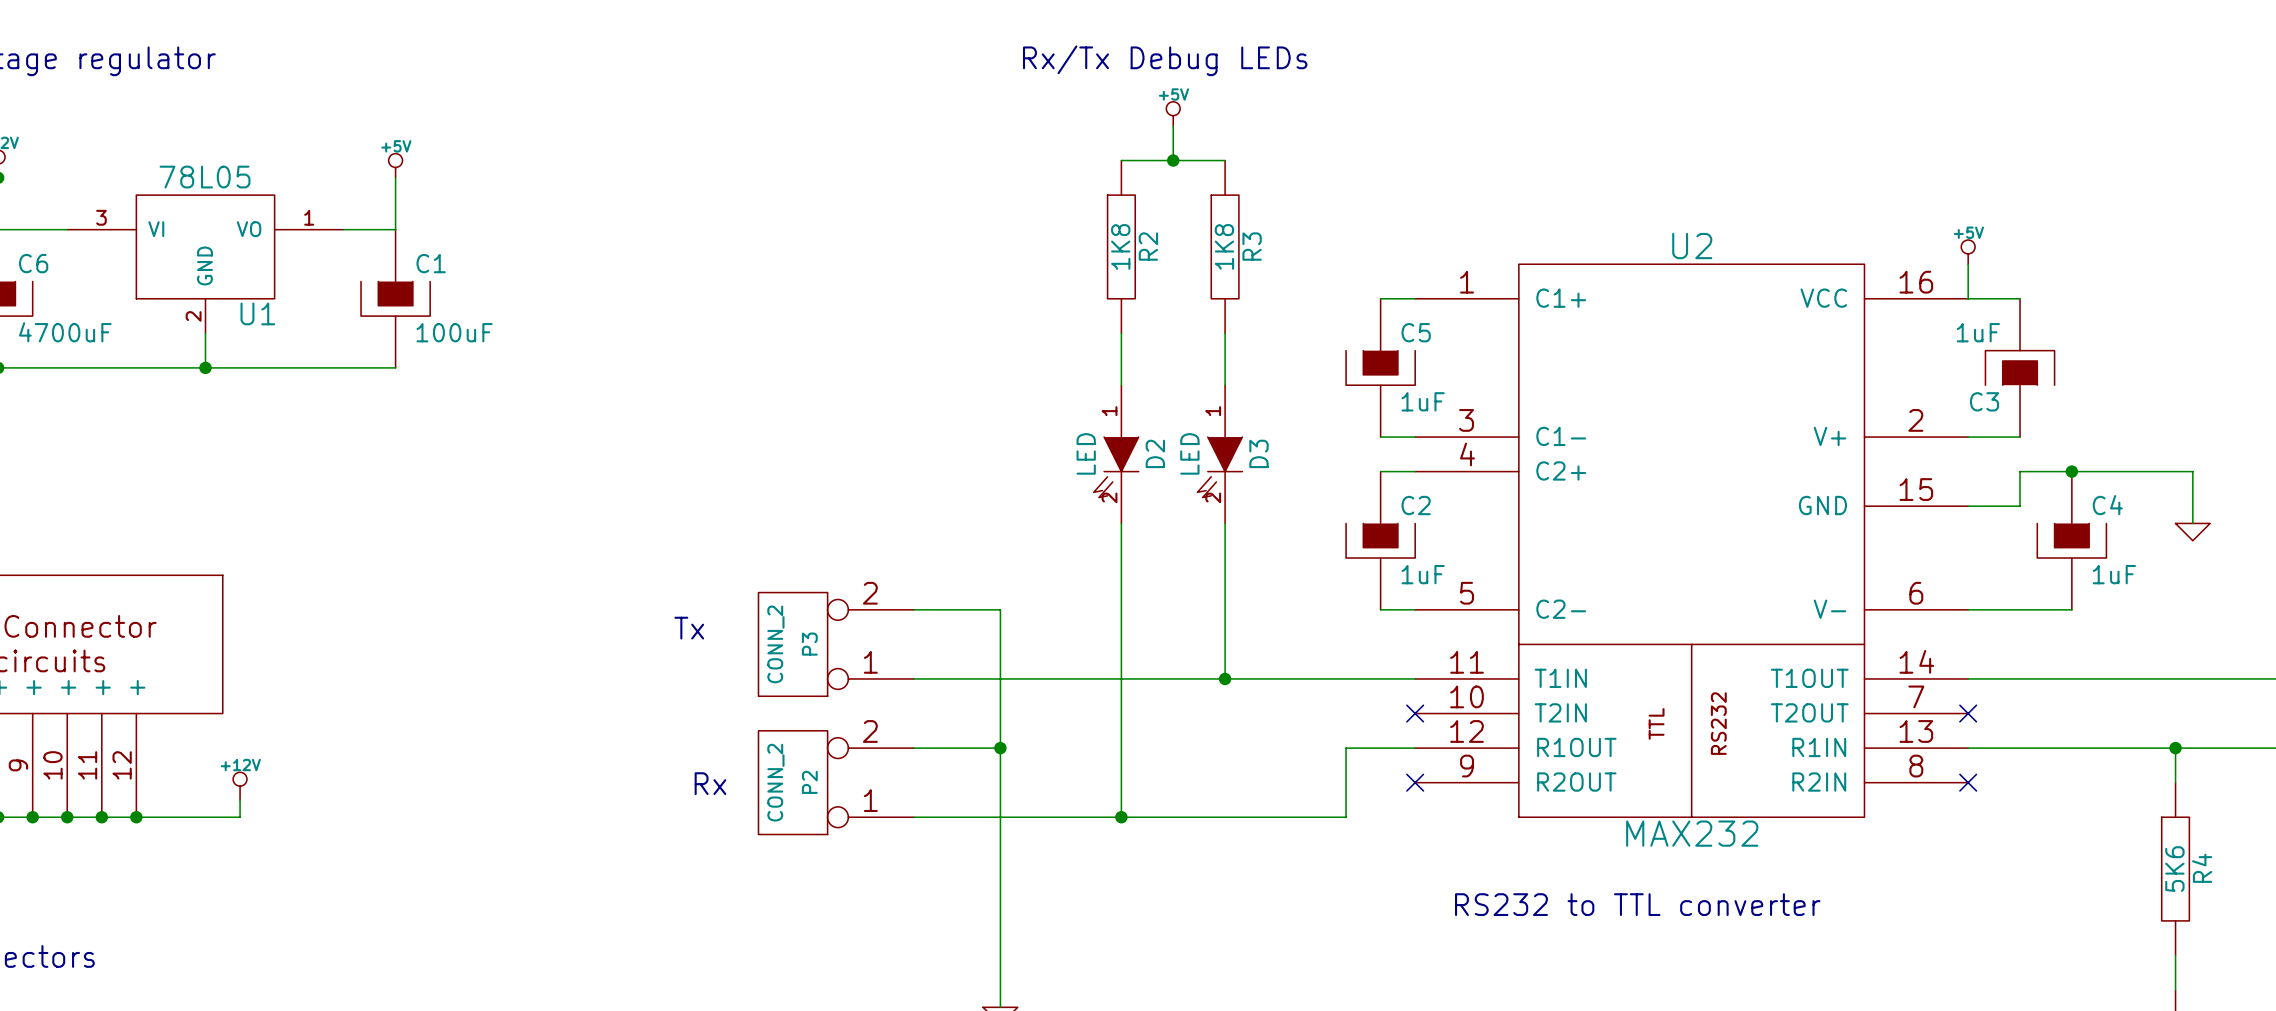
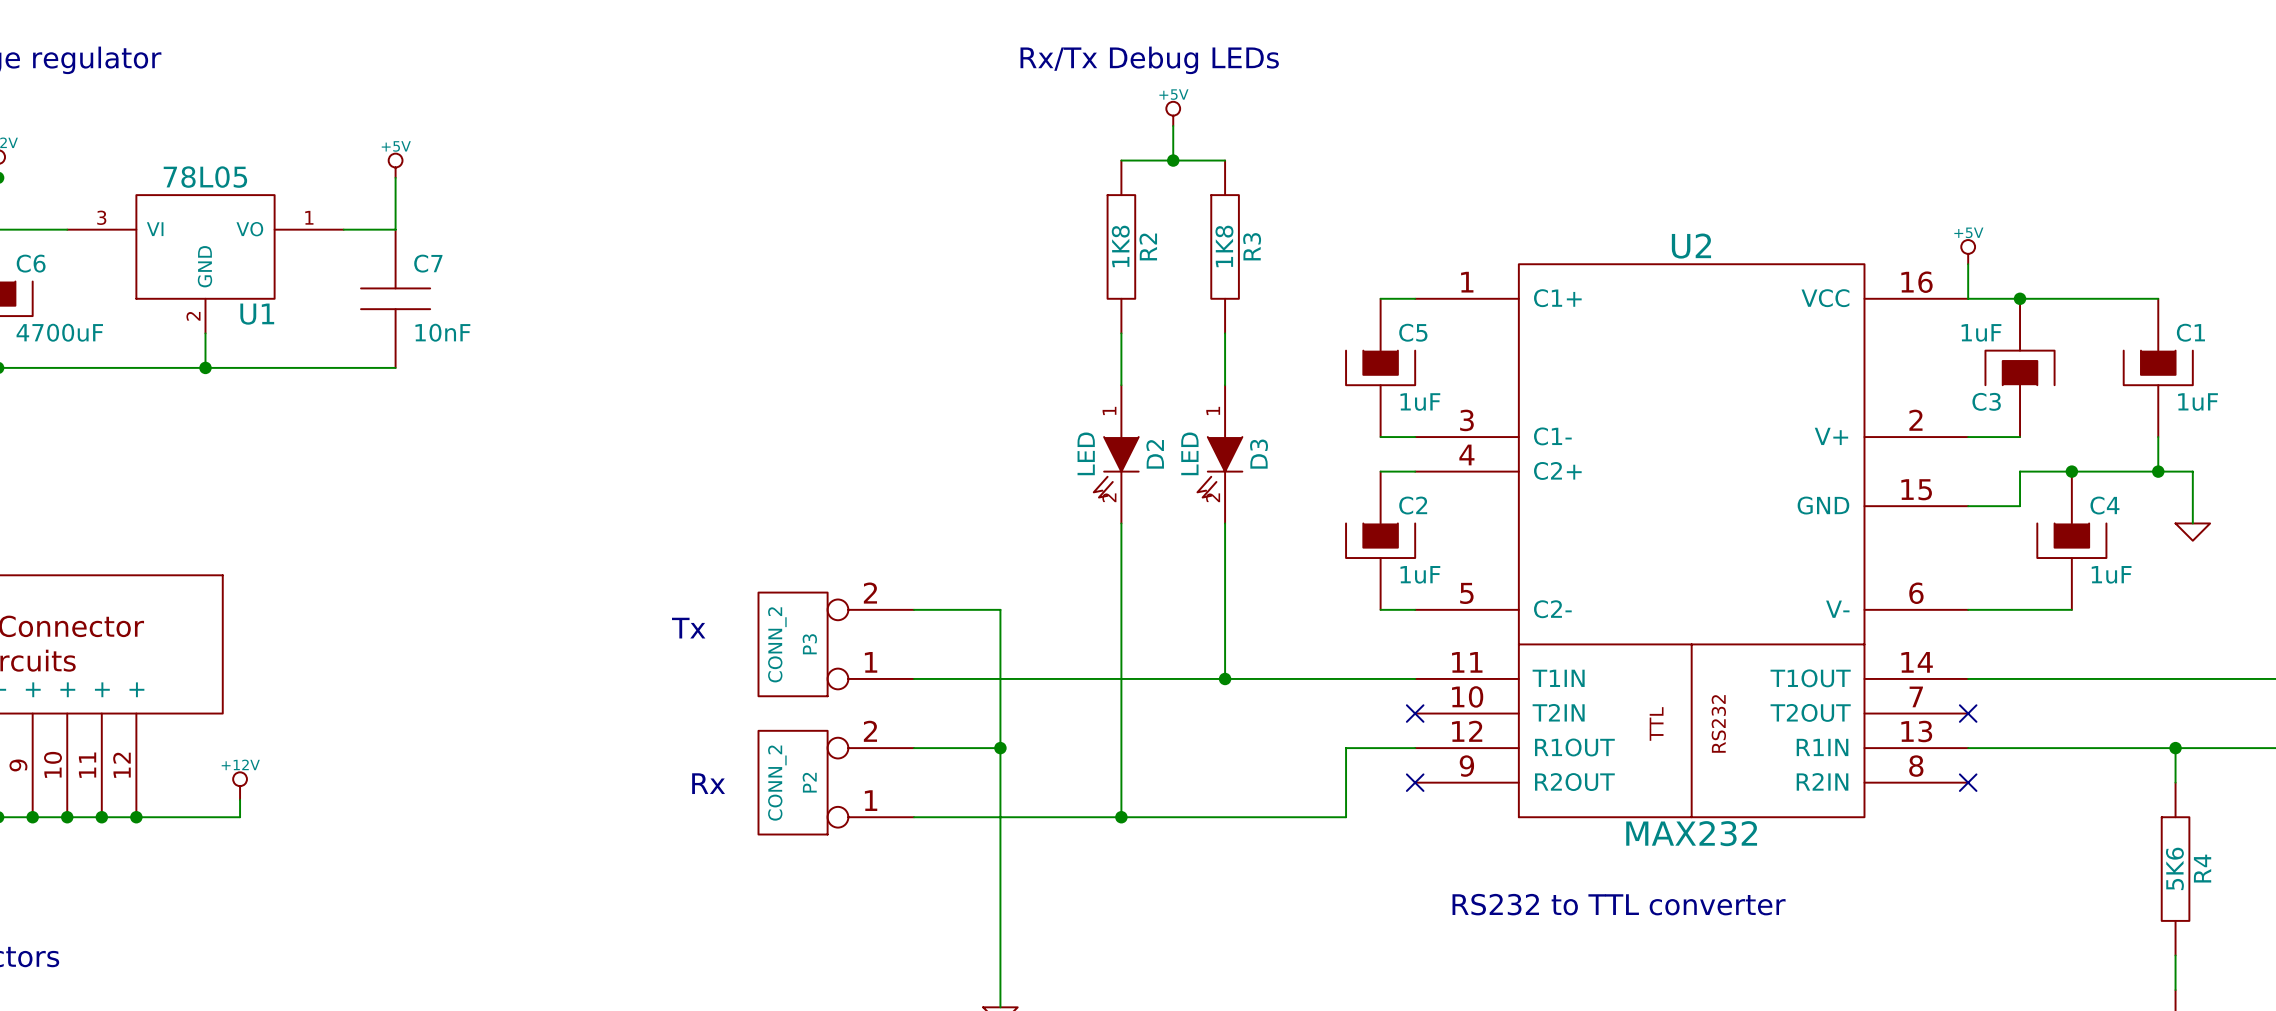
C1 position: (395, 298) -> (2158, 367)
C7: none -> 10nF (395, 298)
wire: none -> (2020, 298) (2158, 298)
junction: none -> (2020, 298)
C1 value: 100uF (454, 332) -> 1uF (2198, 402)
wire: none -> (2158, 437) (2158, 471)
junction: none -> (2158, 471)

